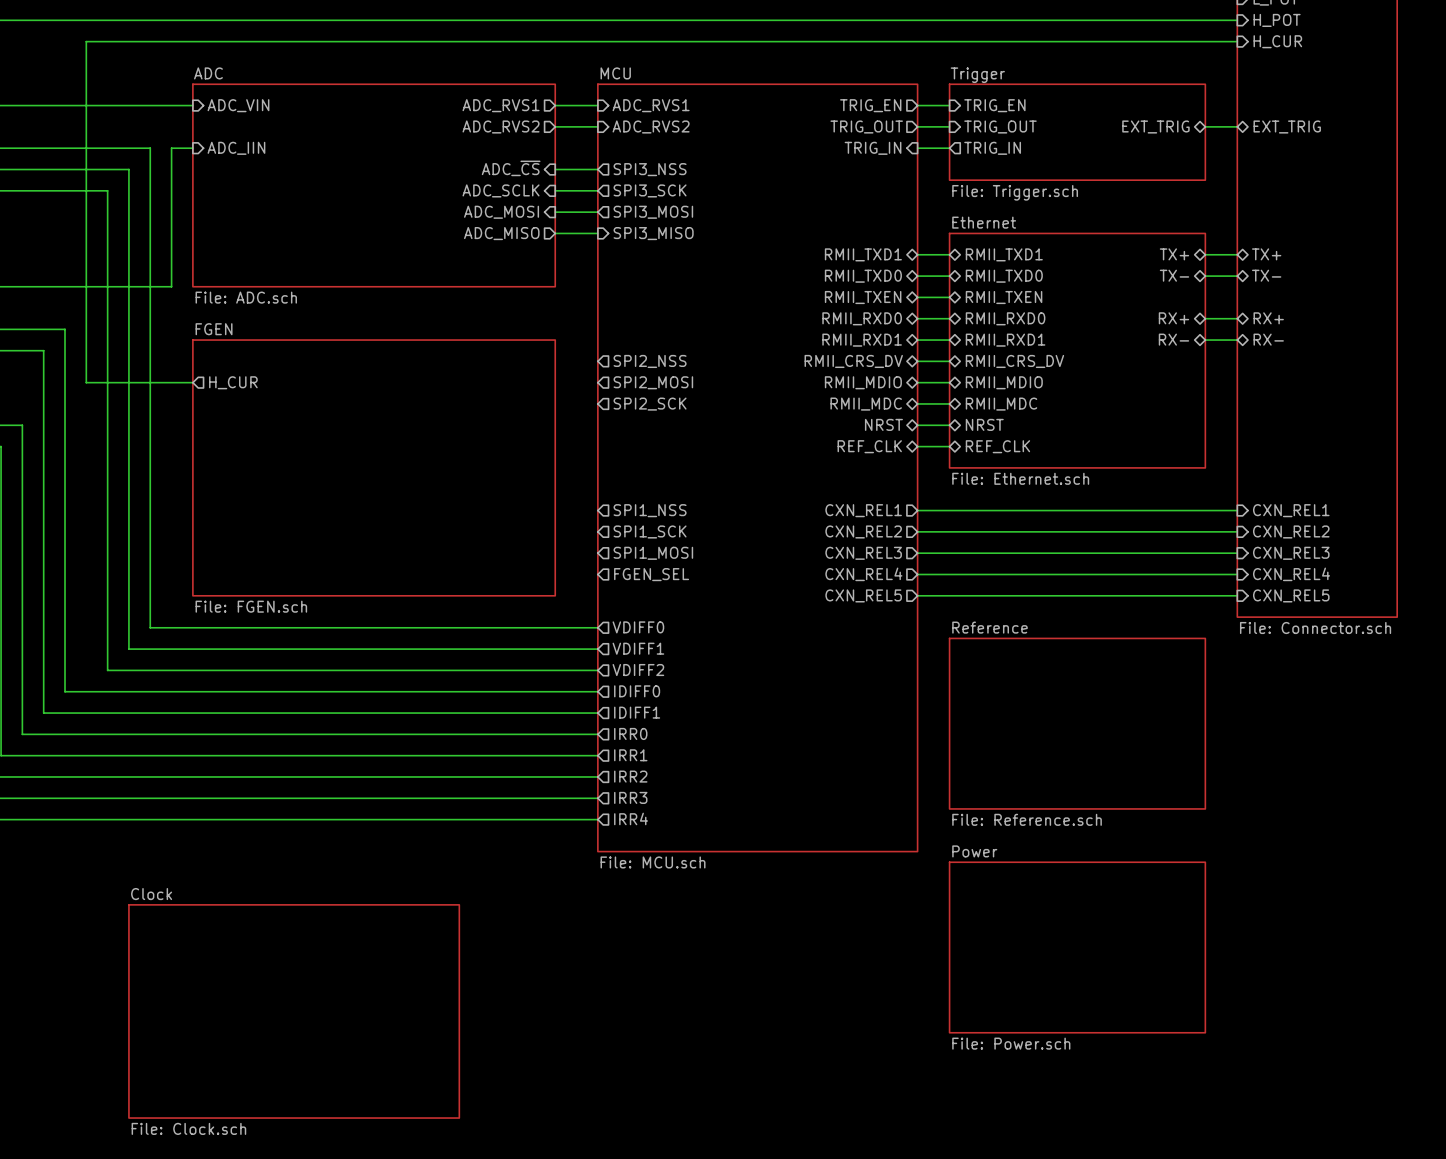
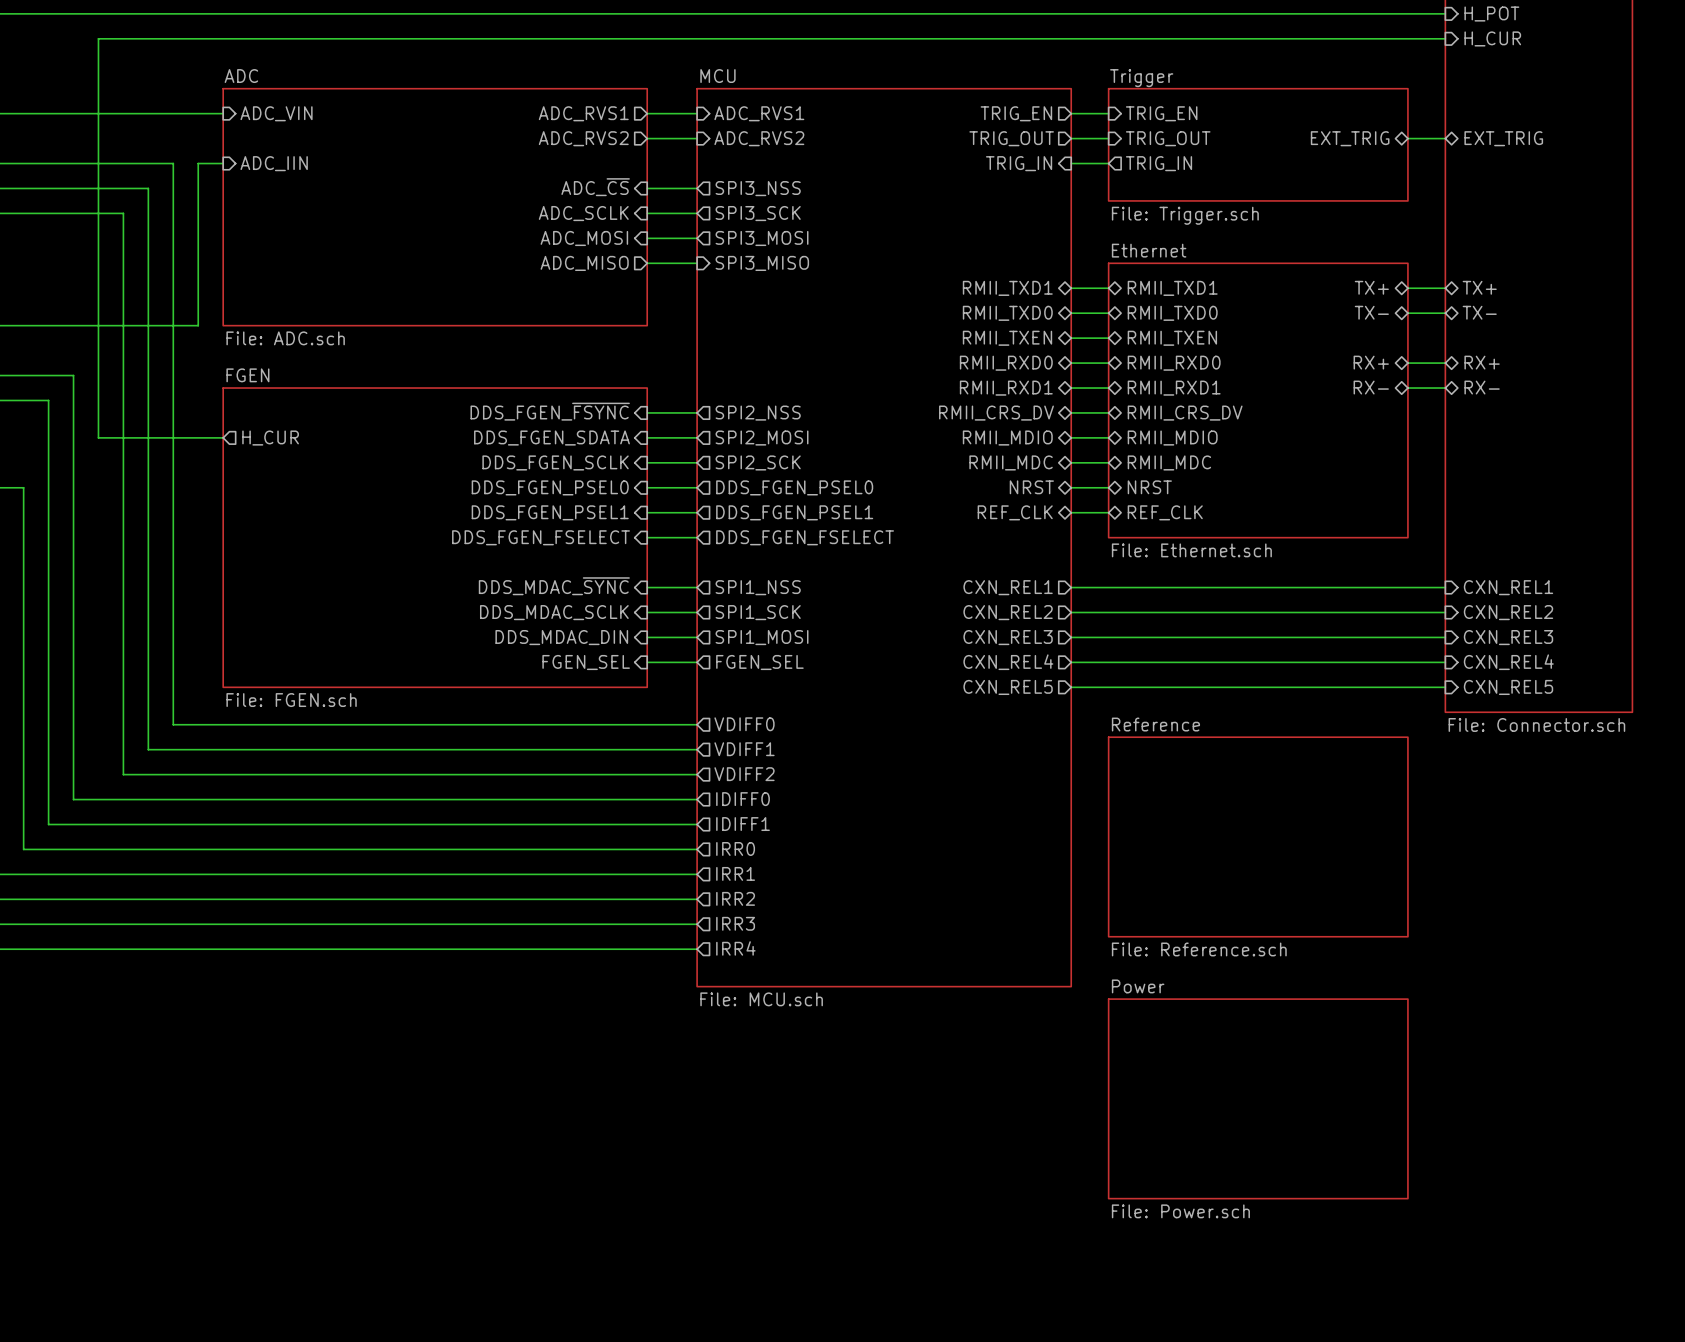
sheet pin: none -> DDS_FGEN_~{FSYNC} (550, 411)
wire: none -> (647, 412) (697, 412)
sheet pin: none -> DDS_FGEN_SDATA (551, 438)
wire: none -> (647, 437) (697, 437)
wire: none -> (647, 462) (697, 462)
sheet pin: none -> DDS_FGEN_SCLK (555, 462)
sheet pin: none -> DDS_FGEN_PSEL0 (550, 487)
wire: none -> (647, 487) (697, 487)
sheet pin: none -> DDS_FGEN_PSEL0 (794, 487)
sheet pin: none -> DDS_FGEN_PSEL1 (550, 512)
wire: none -> (647, 512) (697, 512)
sheet pin: none -> DDS_FGEN_PSEL1 (794, 512)
wire: none -> (647, 537) (697, 537)
sheet pin: none -> DDS_FGEN_FSELECT (541, 537)
sheet pin: none -> DDS_FGEN_FSELECT (805, 537)
sheet pin: none -> DDS_MDAC_~{SYNC} (554, 586)
wire: none -> (647, 587) (697, 587)
sheet pin: none -> DDS_MDAC_SCLK (554, 612)
wire: none -> (647, 612) (697, 612)
sheet pin: none -> DDS_MDAC_DIN (561, 637)
wire: none -> (647, 637) (697, 637)
sheet pin: none -> FGEN_SEL (586, 662)
wire: none -> (647, 662) (697, 662)
sheet Clock: File: Clock.sch (294, 1011) -> none

